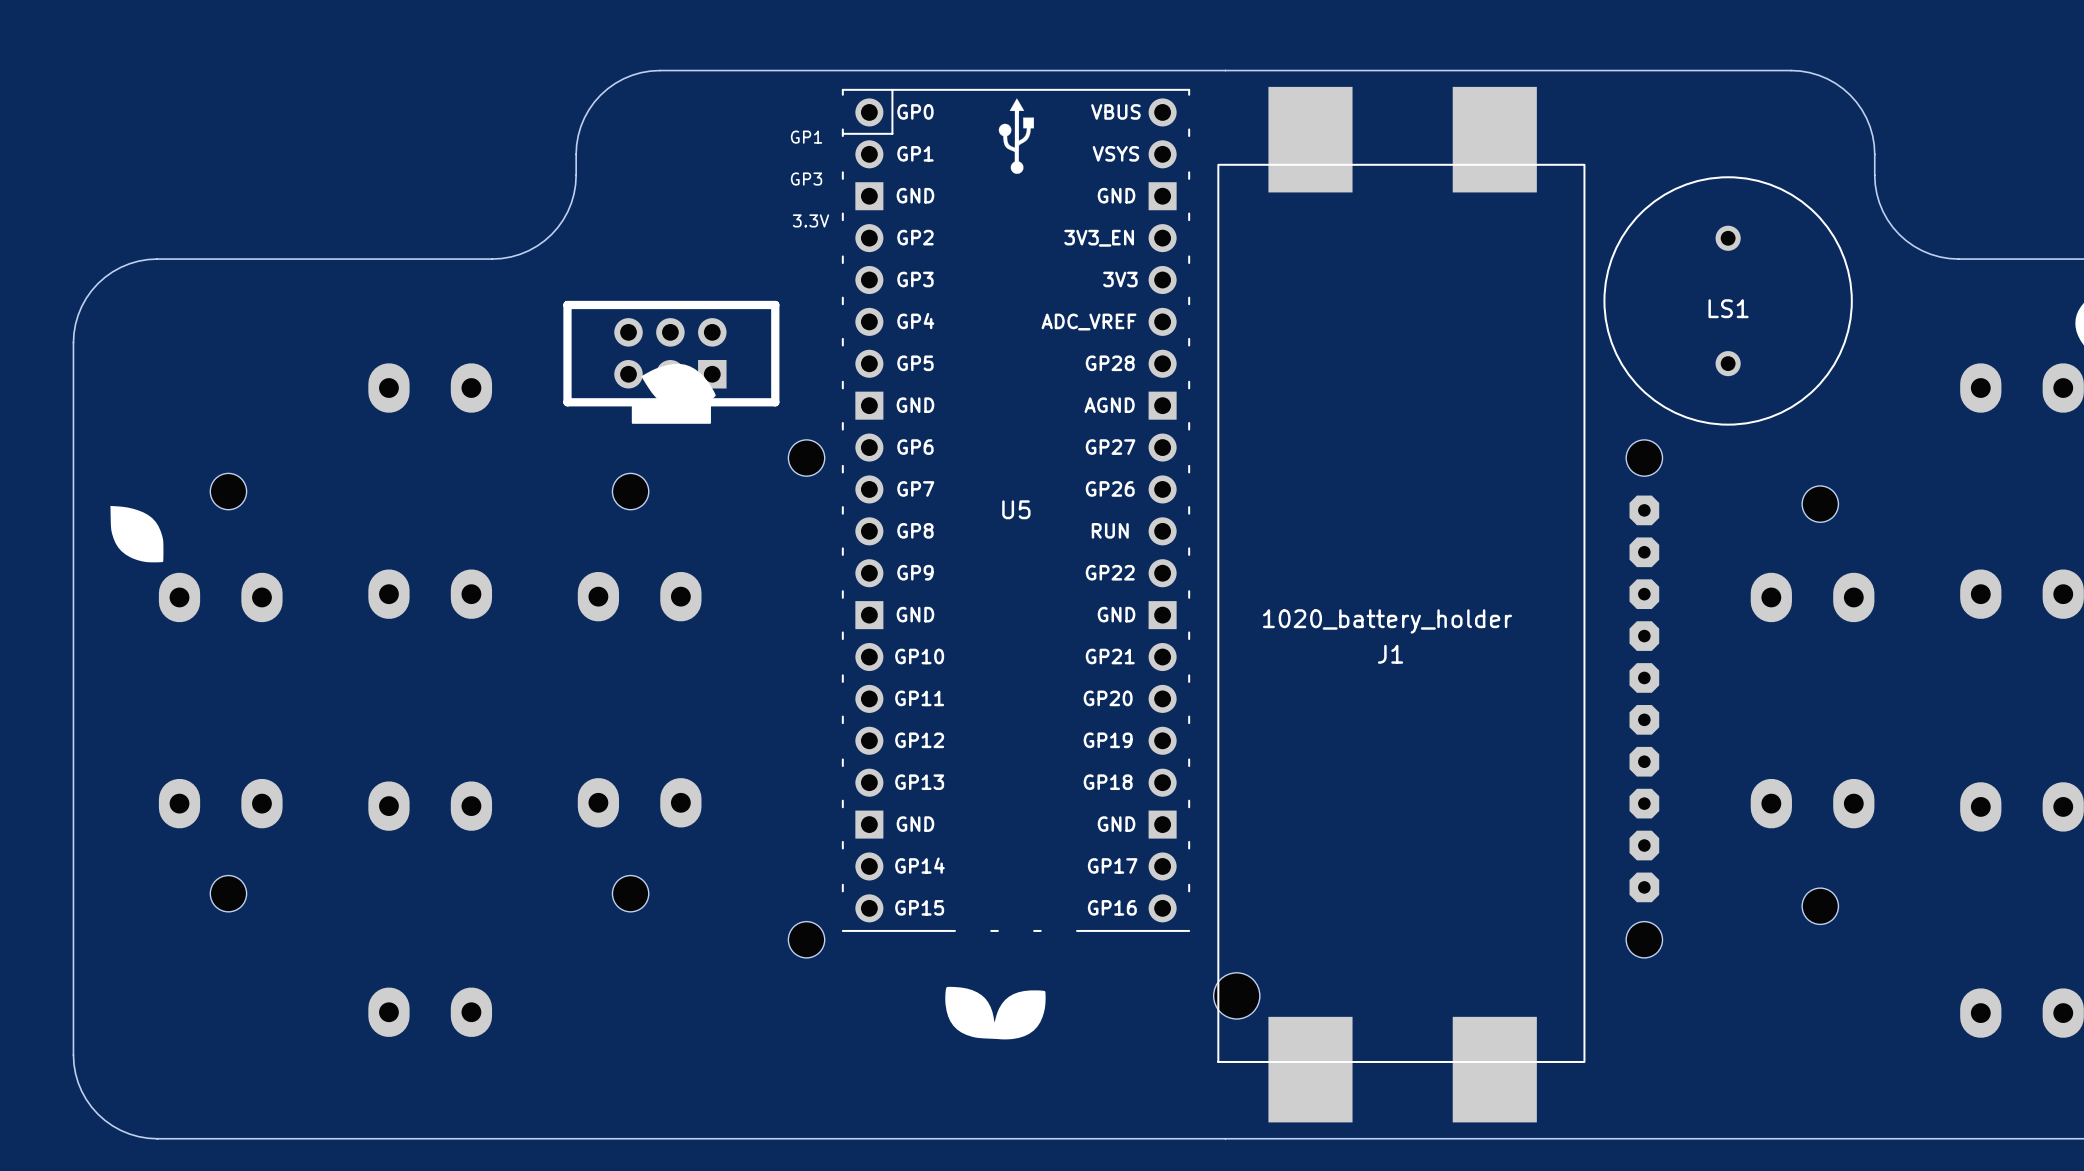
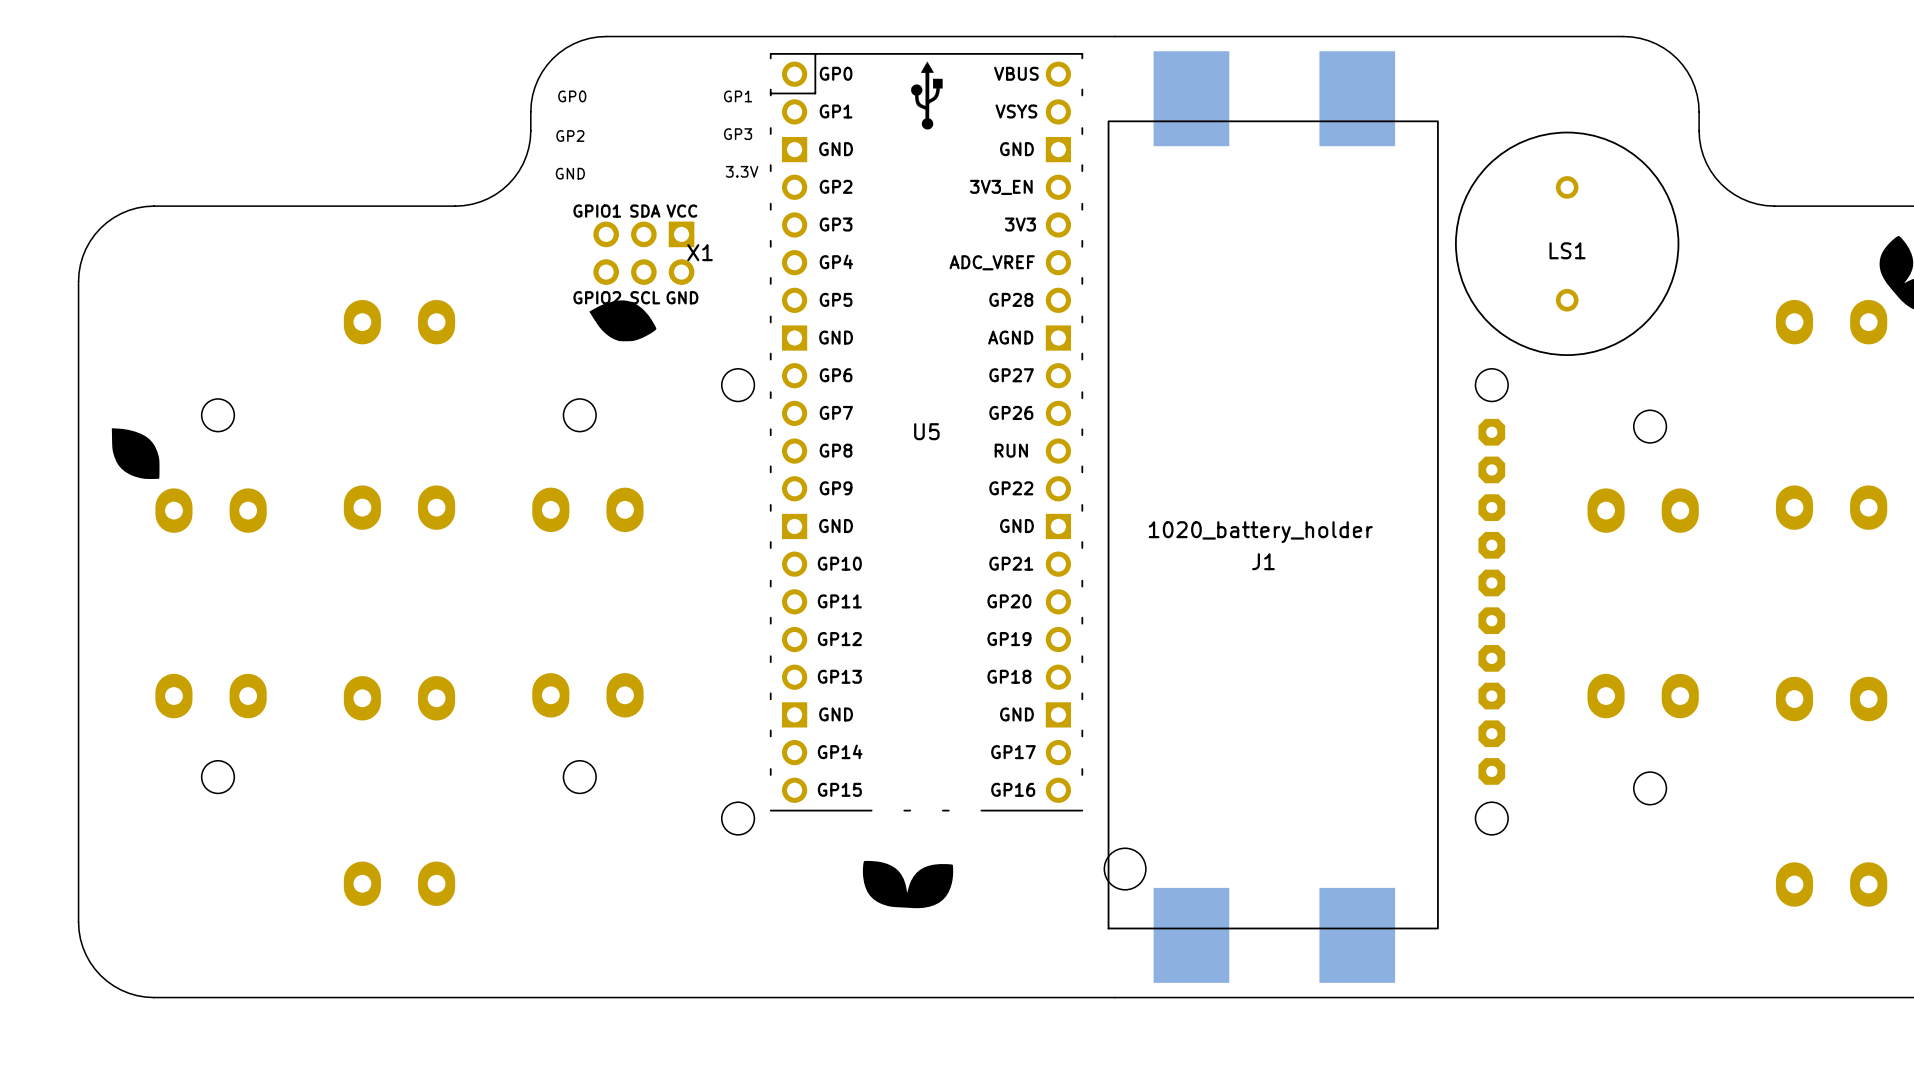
text: none -> GP0 (572, 96)
text: none -> GP2 (570, 136)
text: none -> GND (570, 173)
X1 side: bottom (671, 362) -> top (643, 253)

